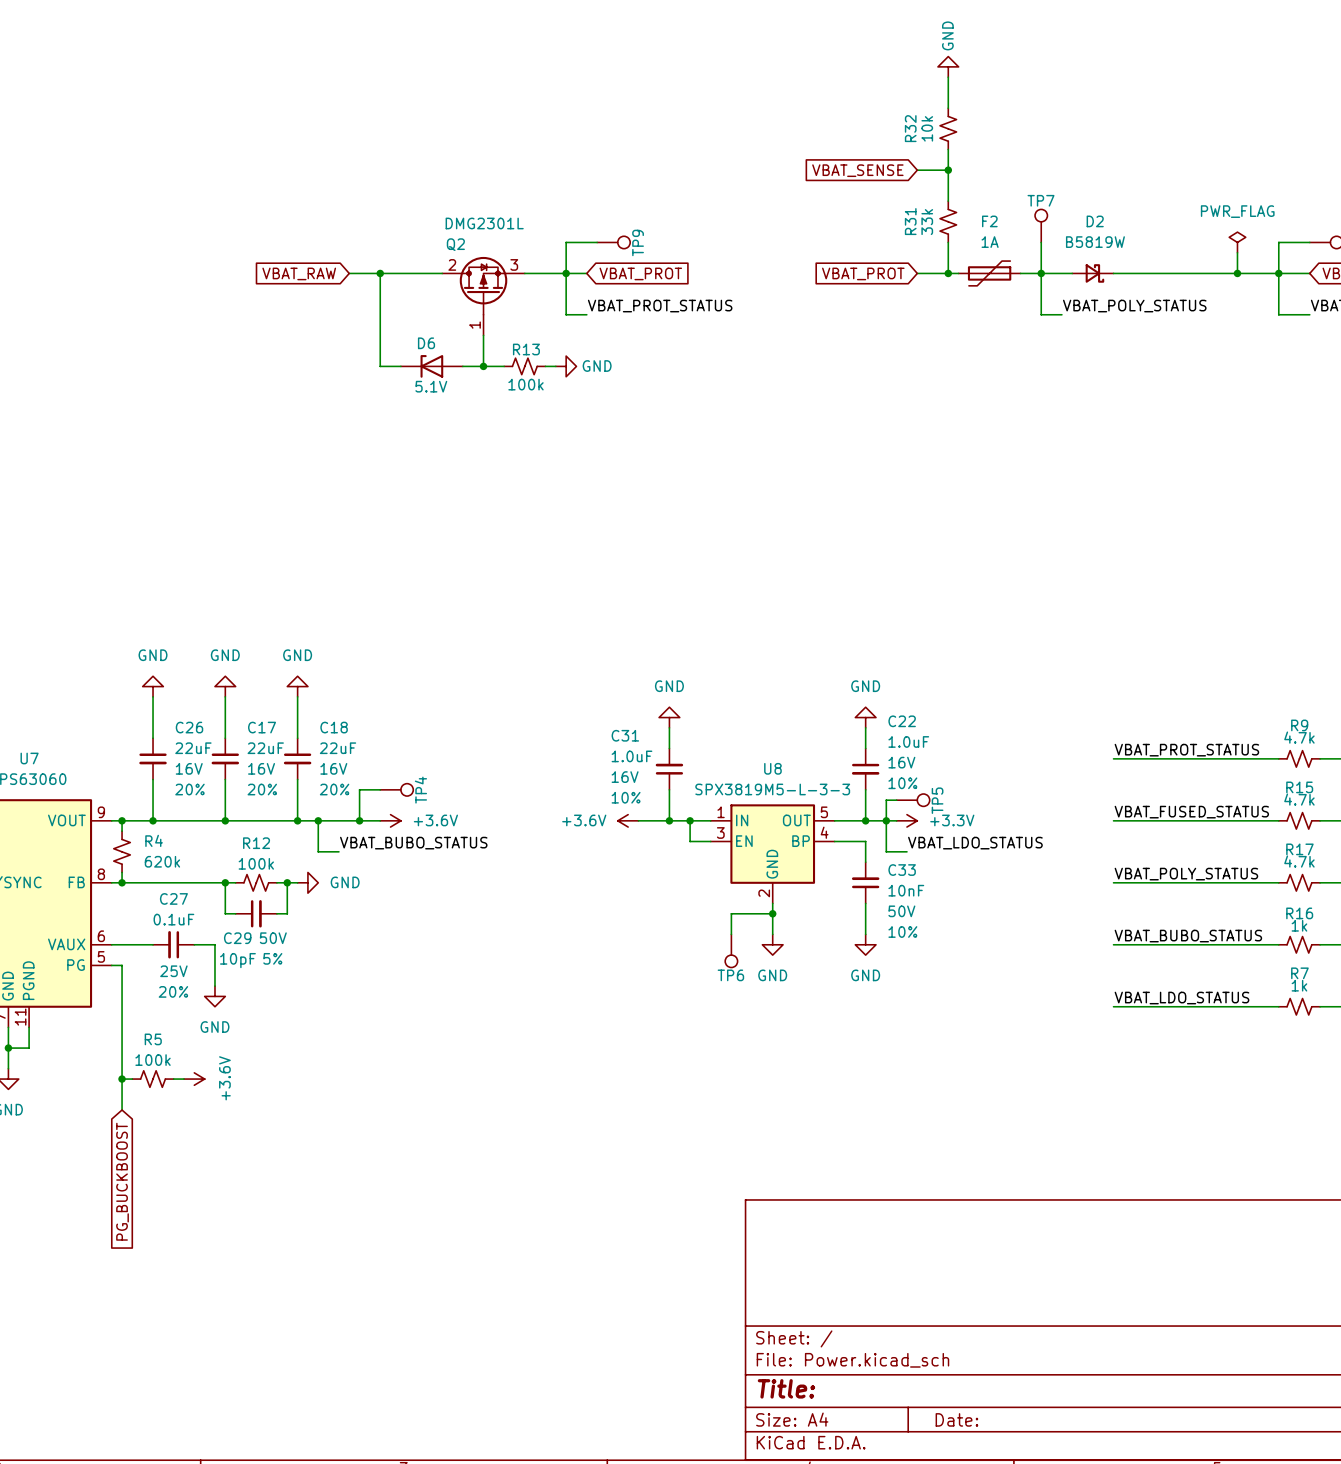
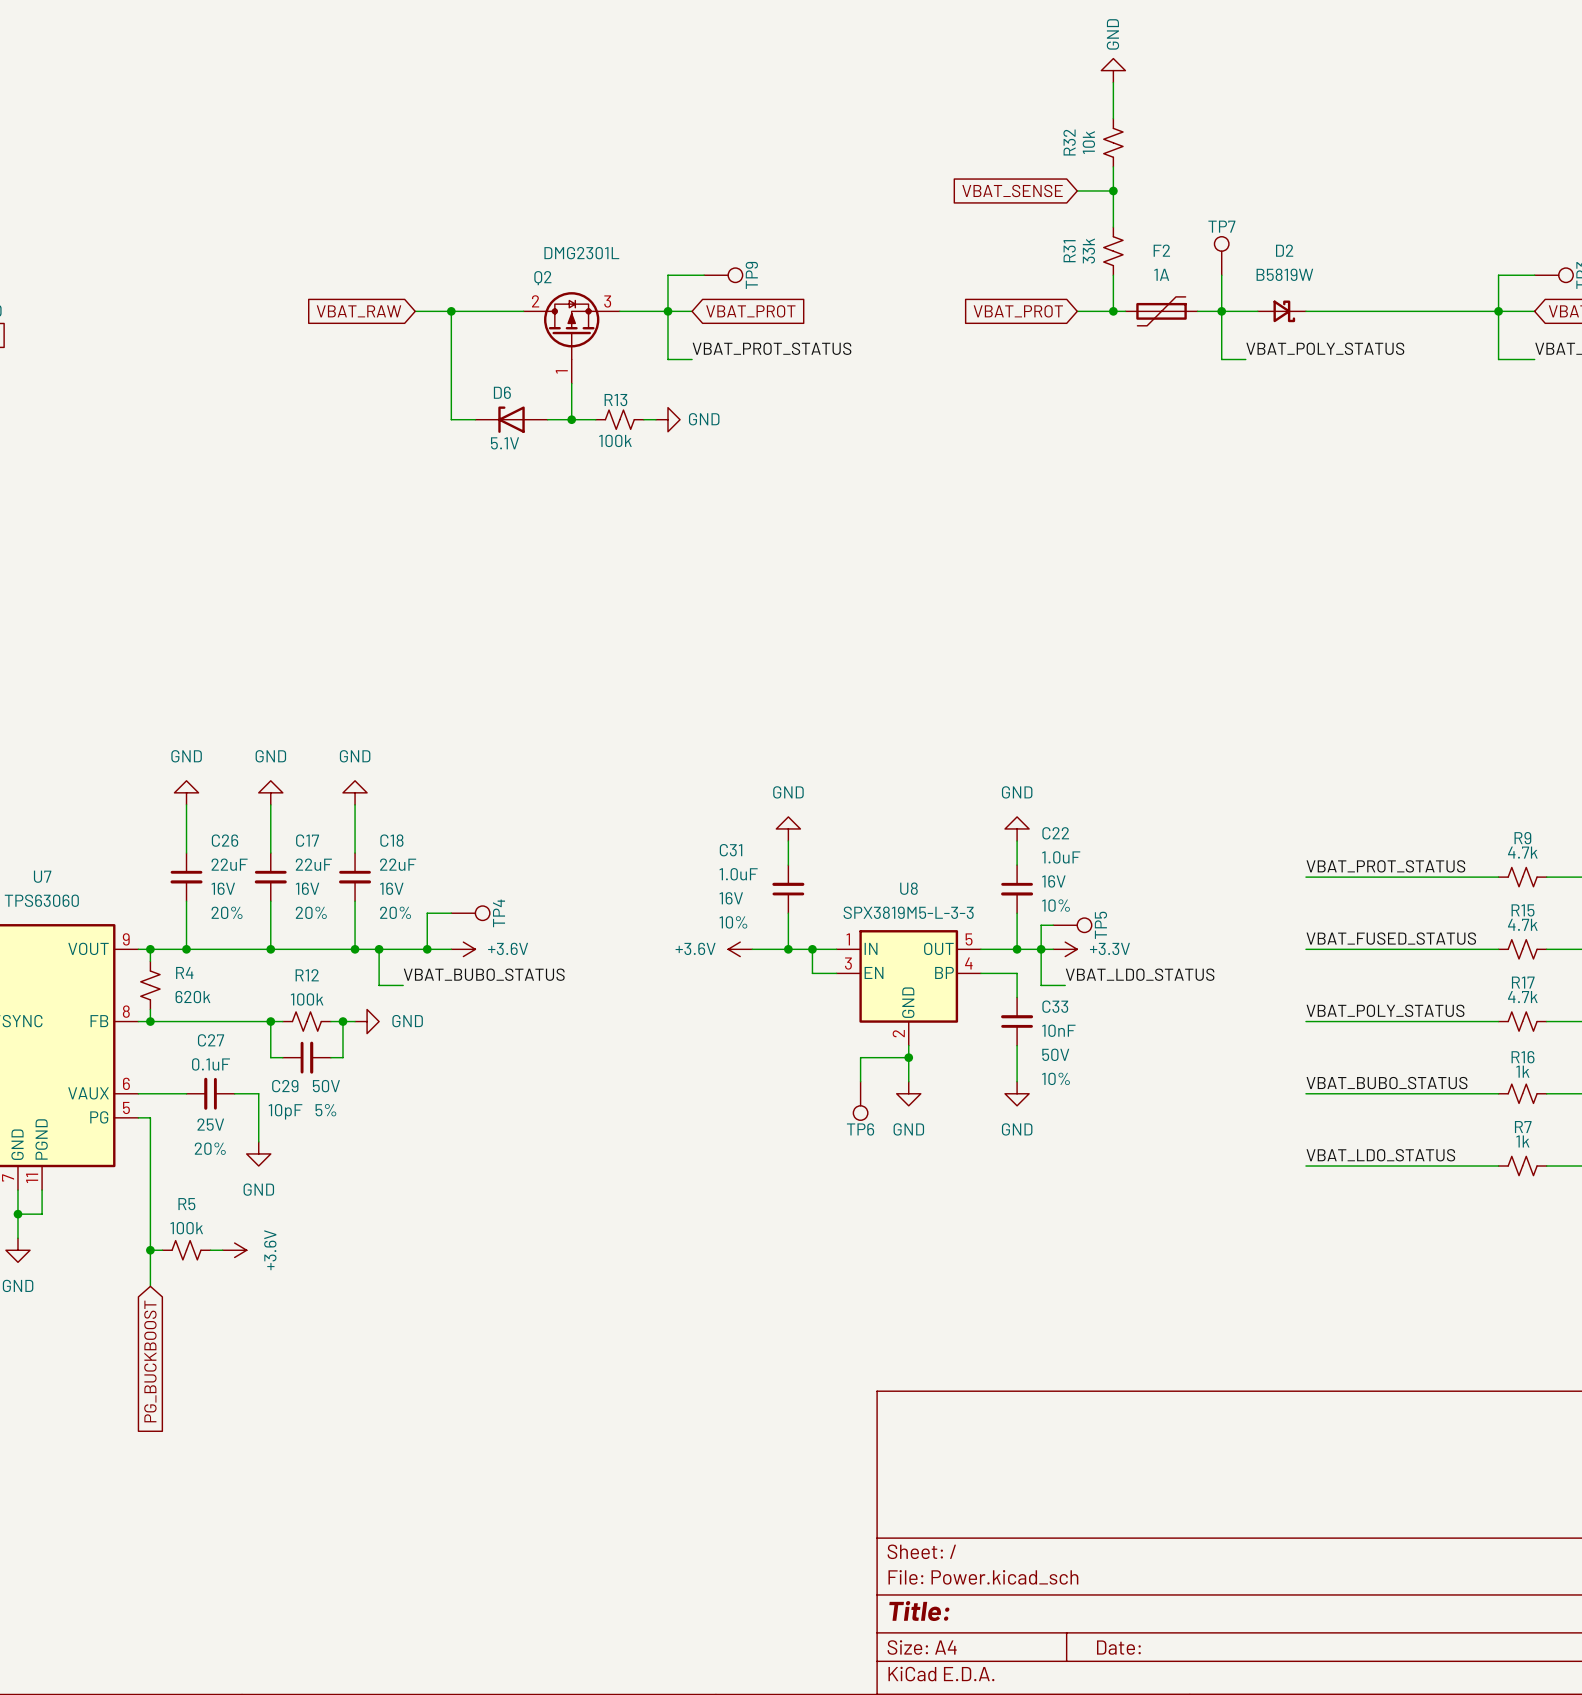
power symbol: PWR_FLAG (1237, 242) -> none
wire: (1237, 252) (1237, 273) -> none
junction: (1237, 273) -> none

